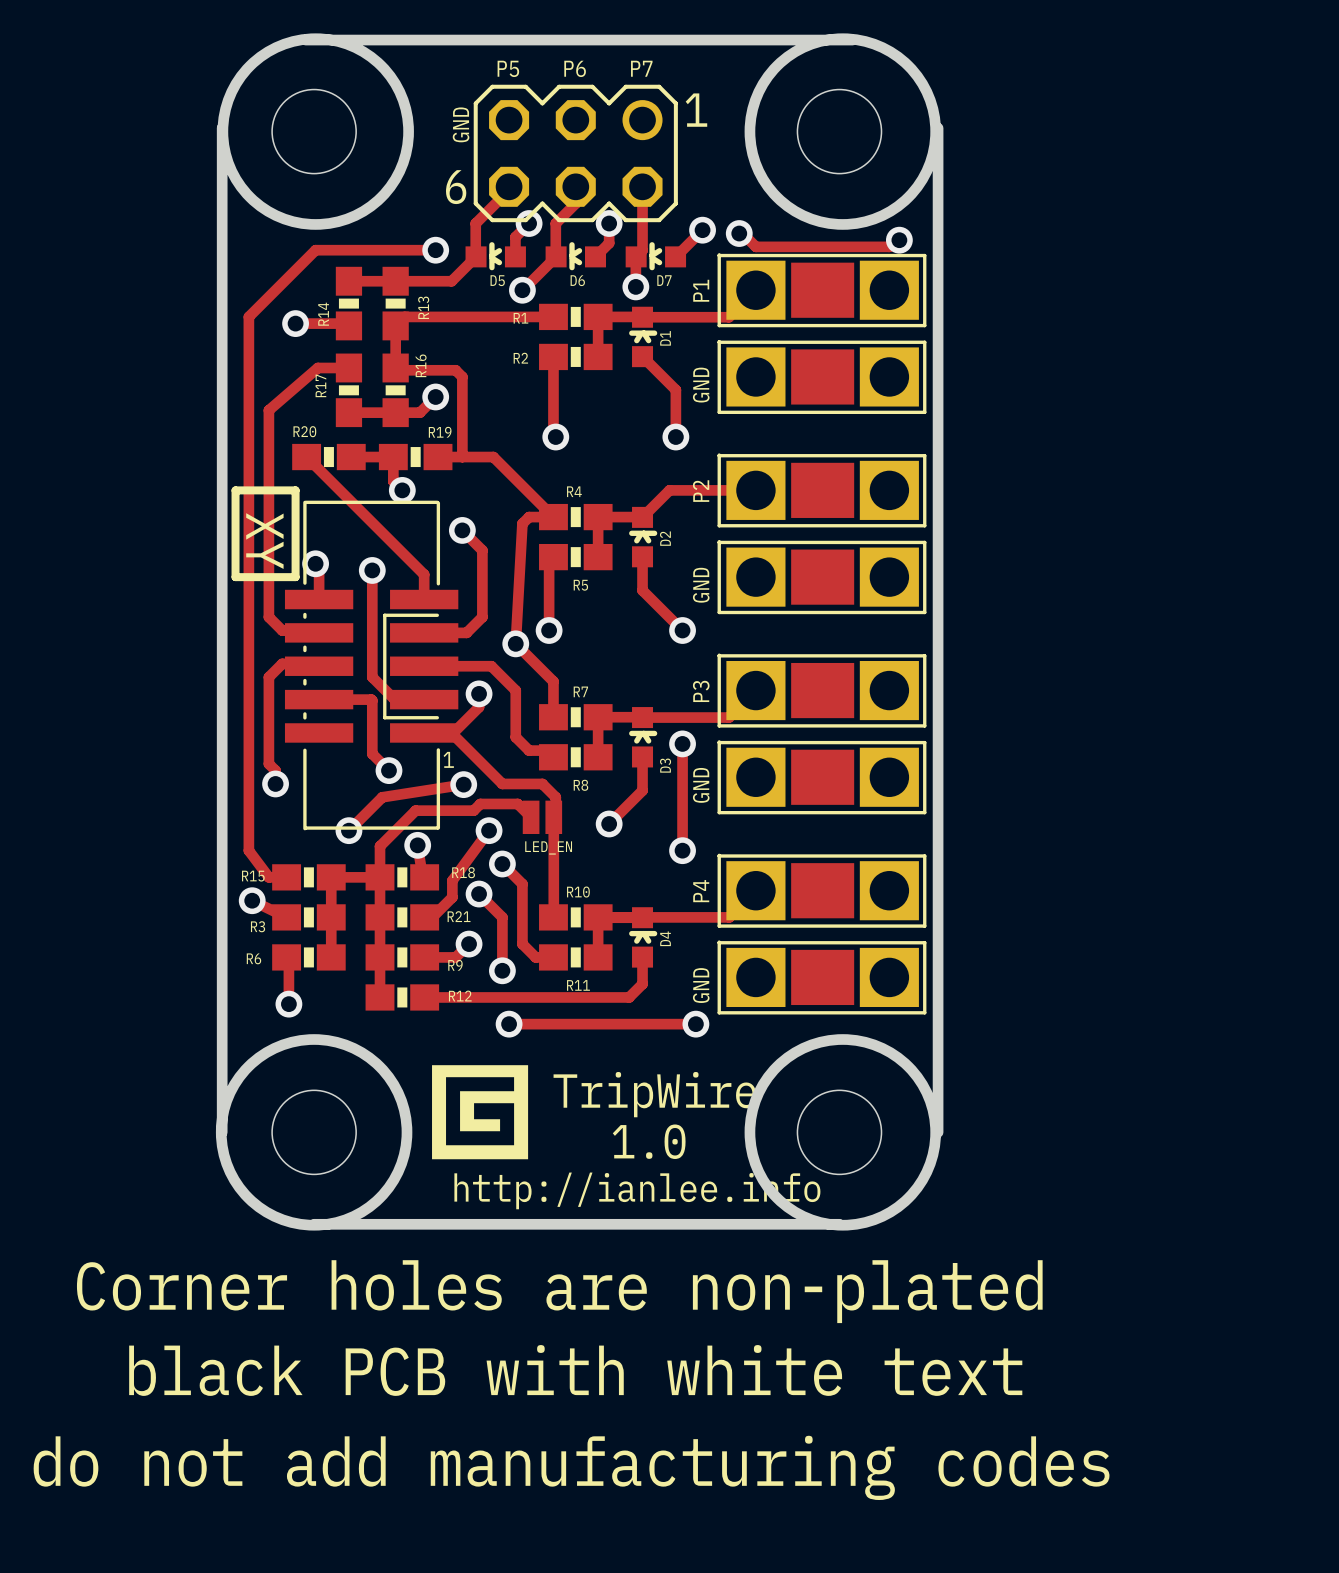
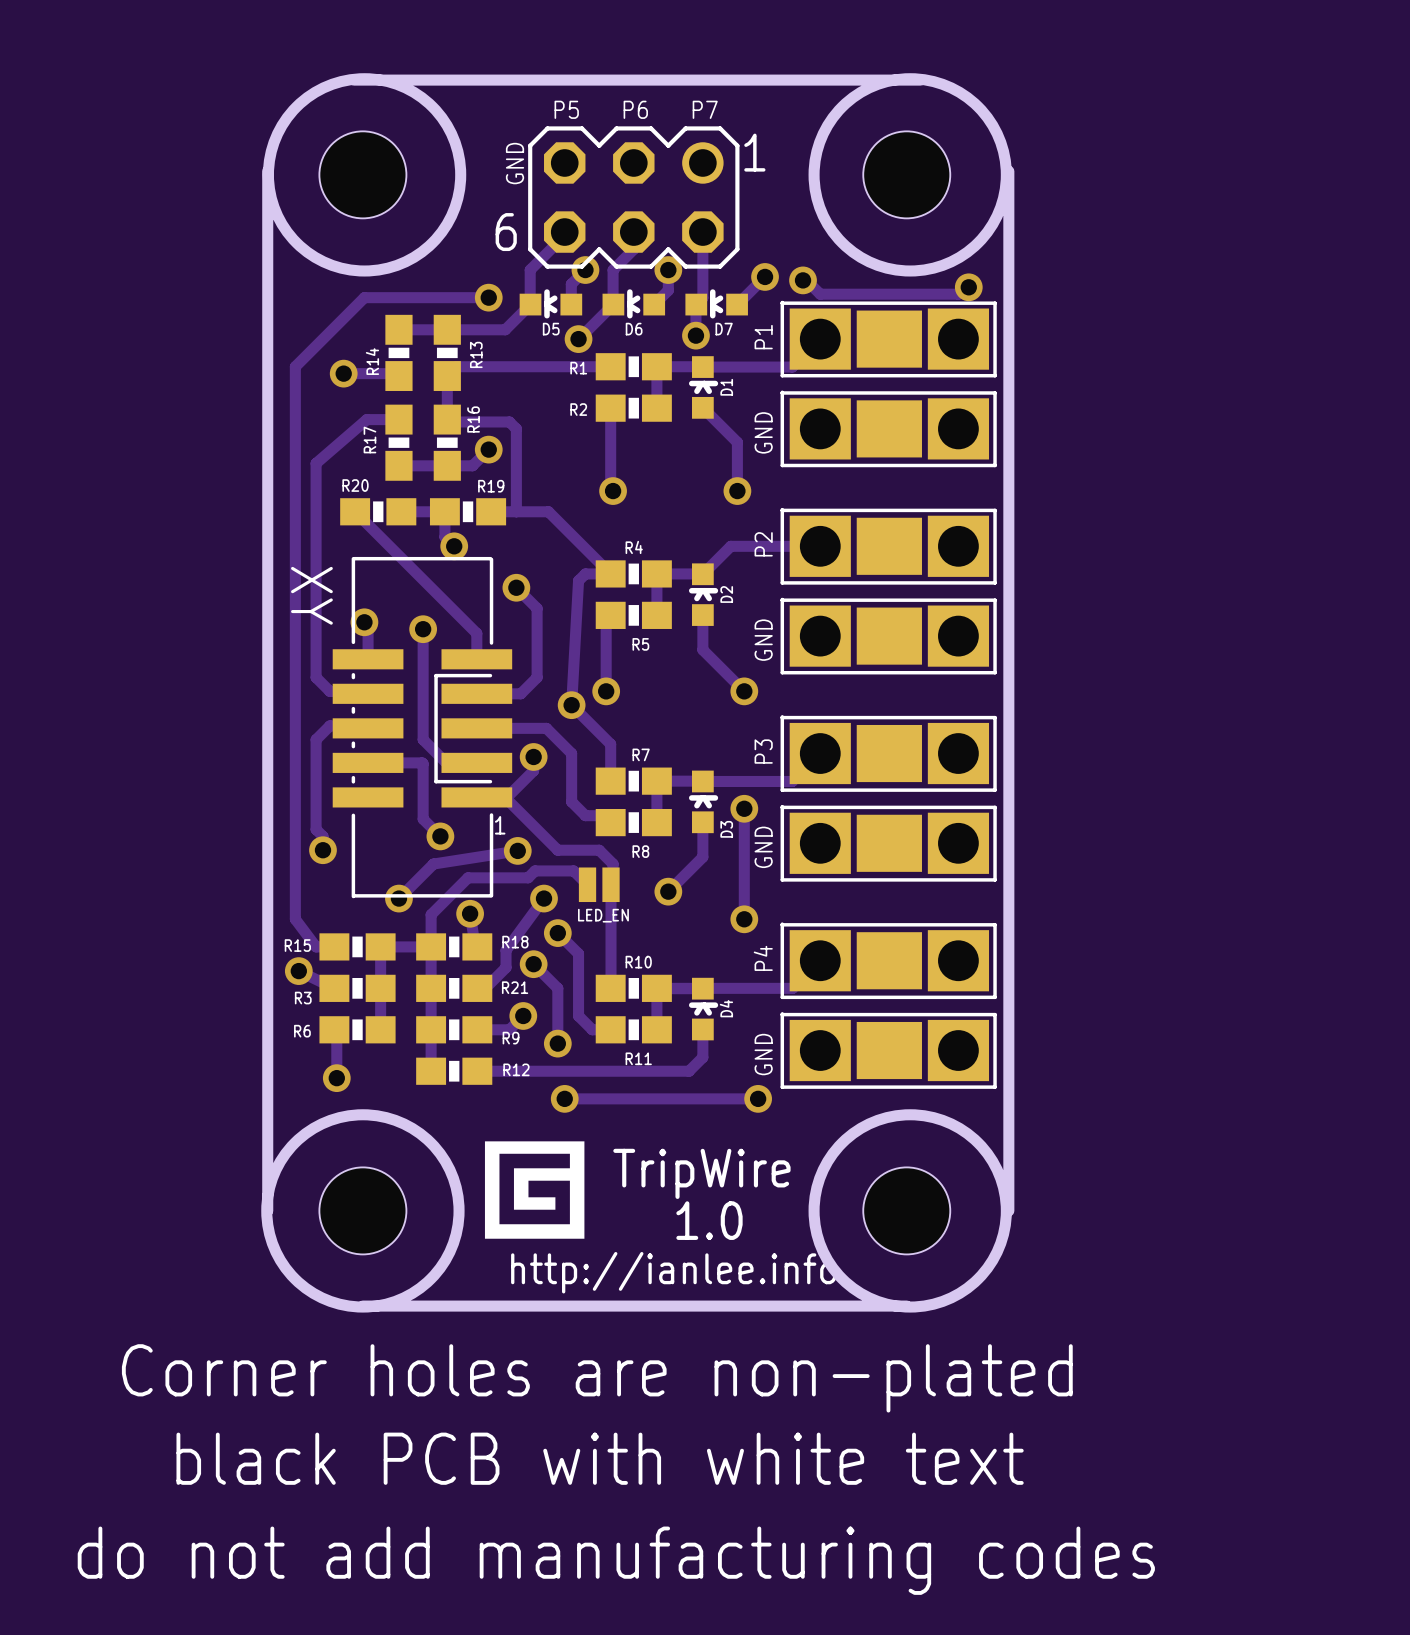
line: (235, 490) (235, 577) (295, 577) (295, 490) (235, 490) -> none

